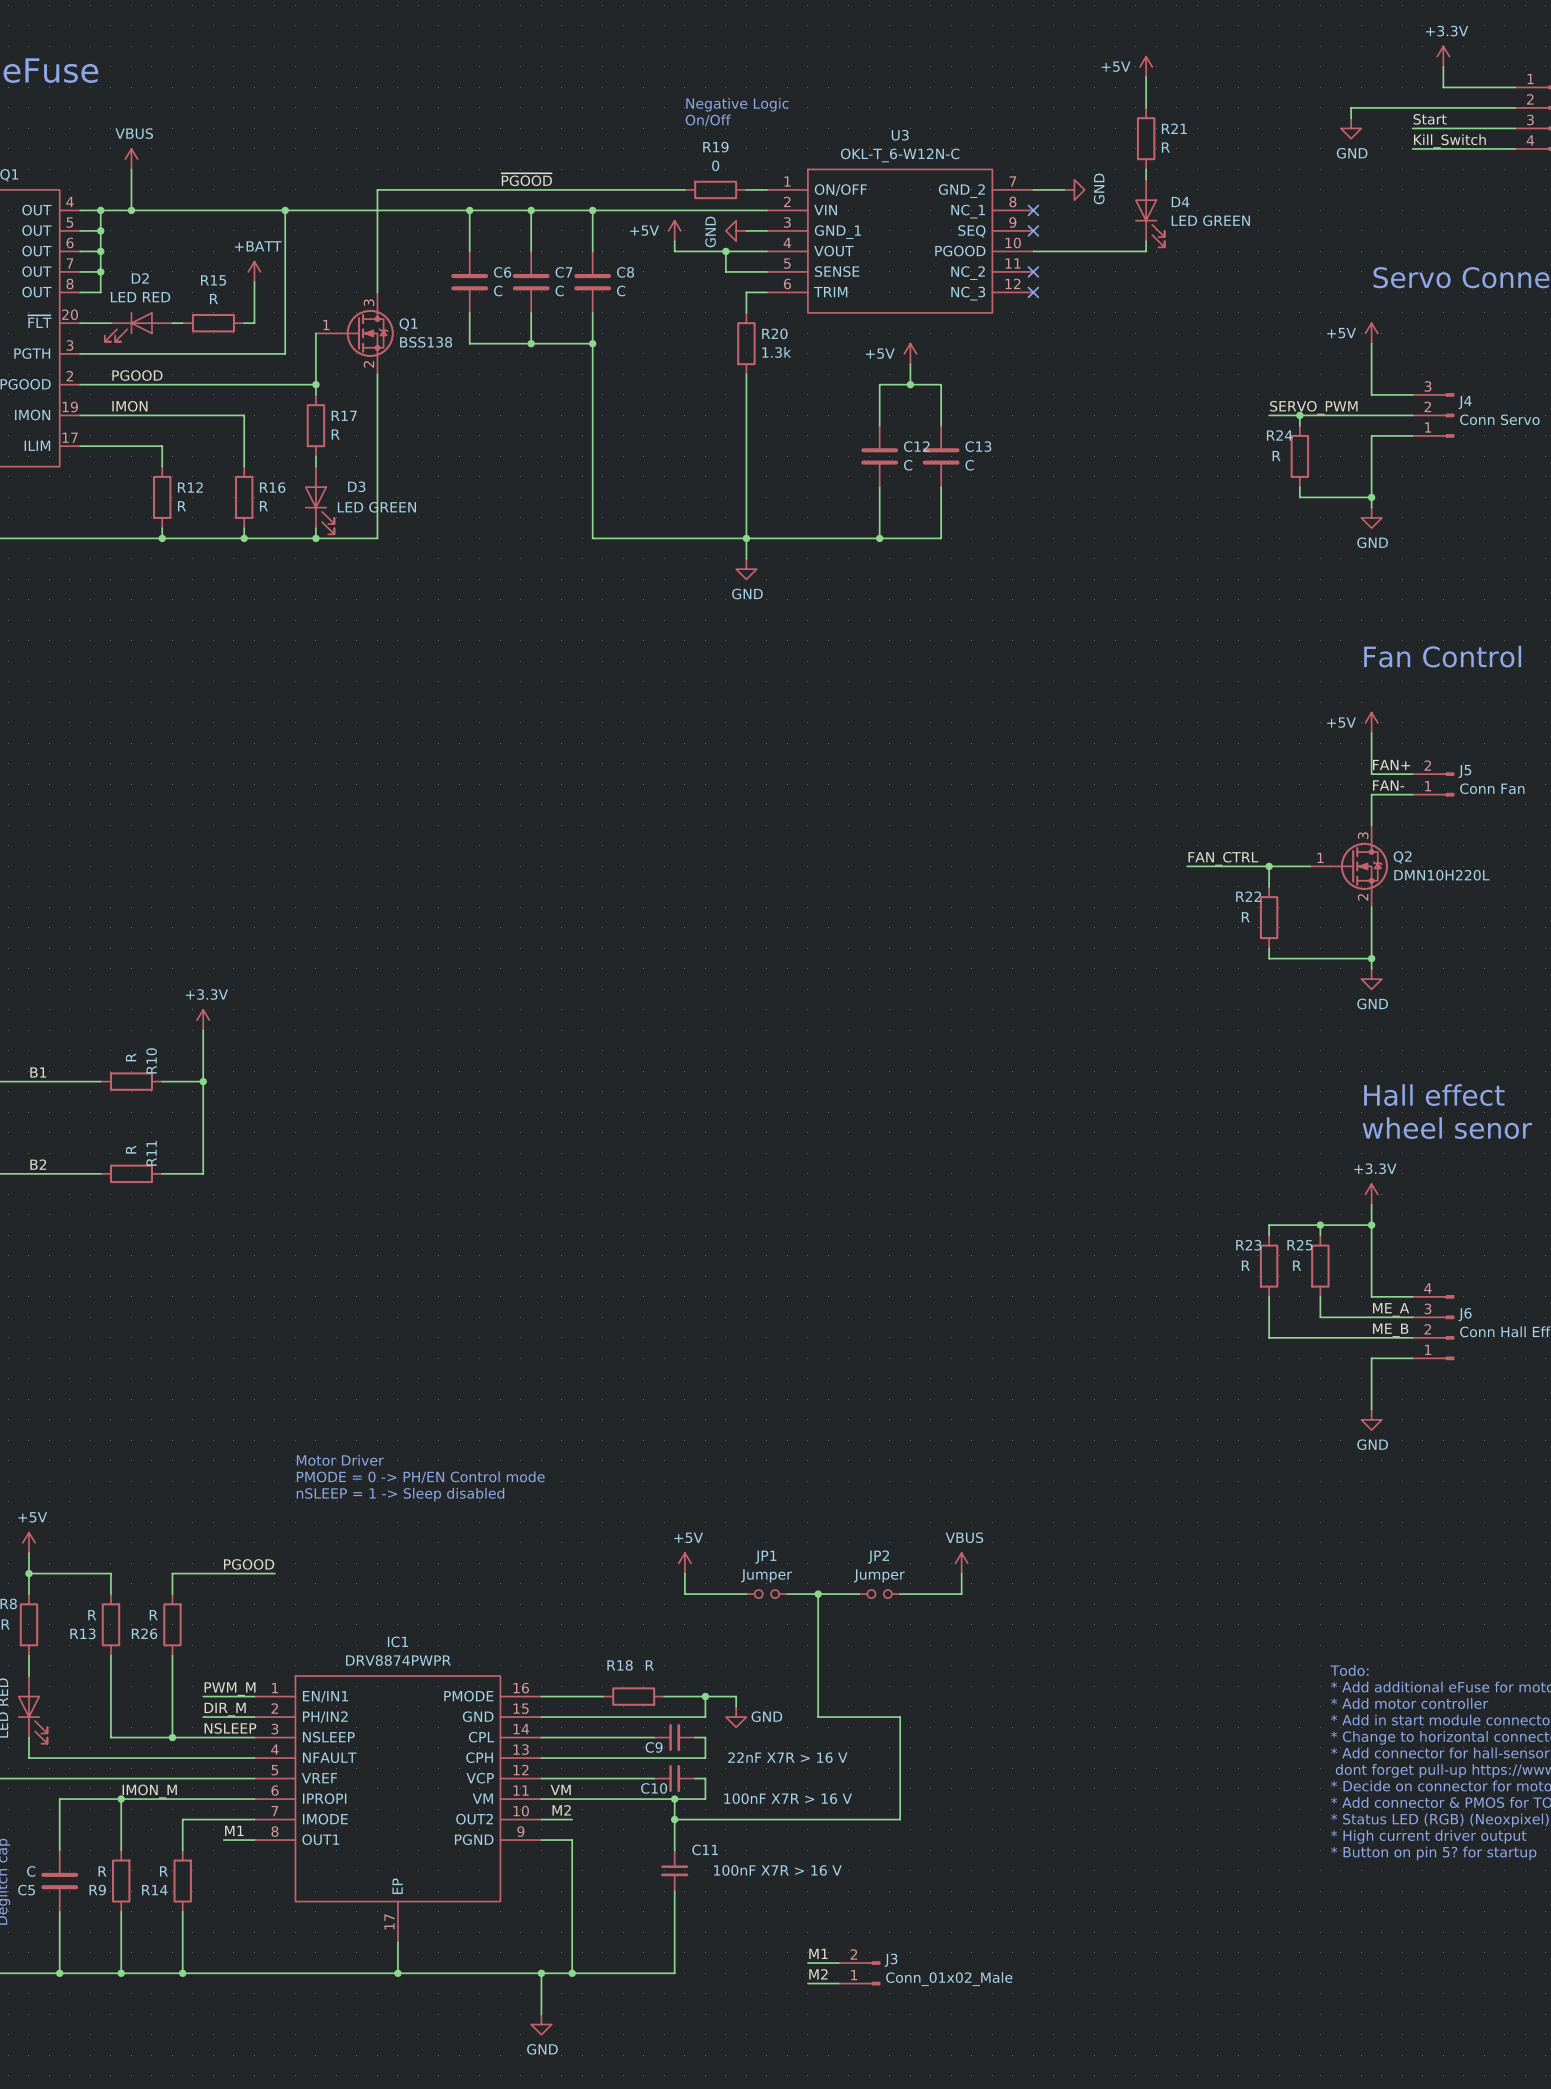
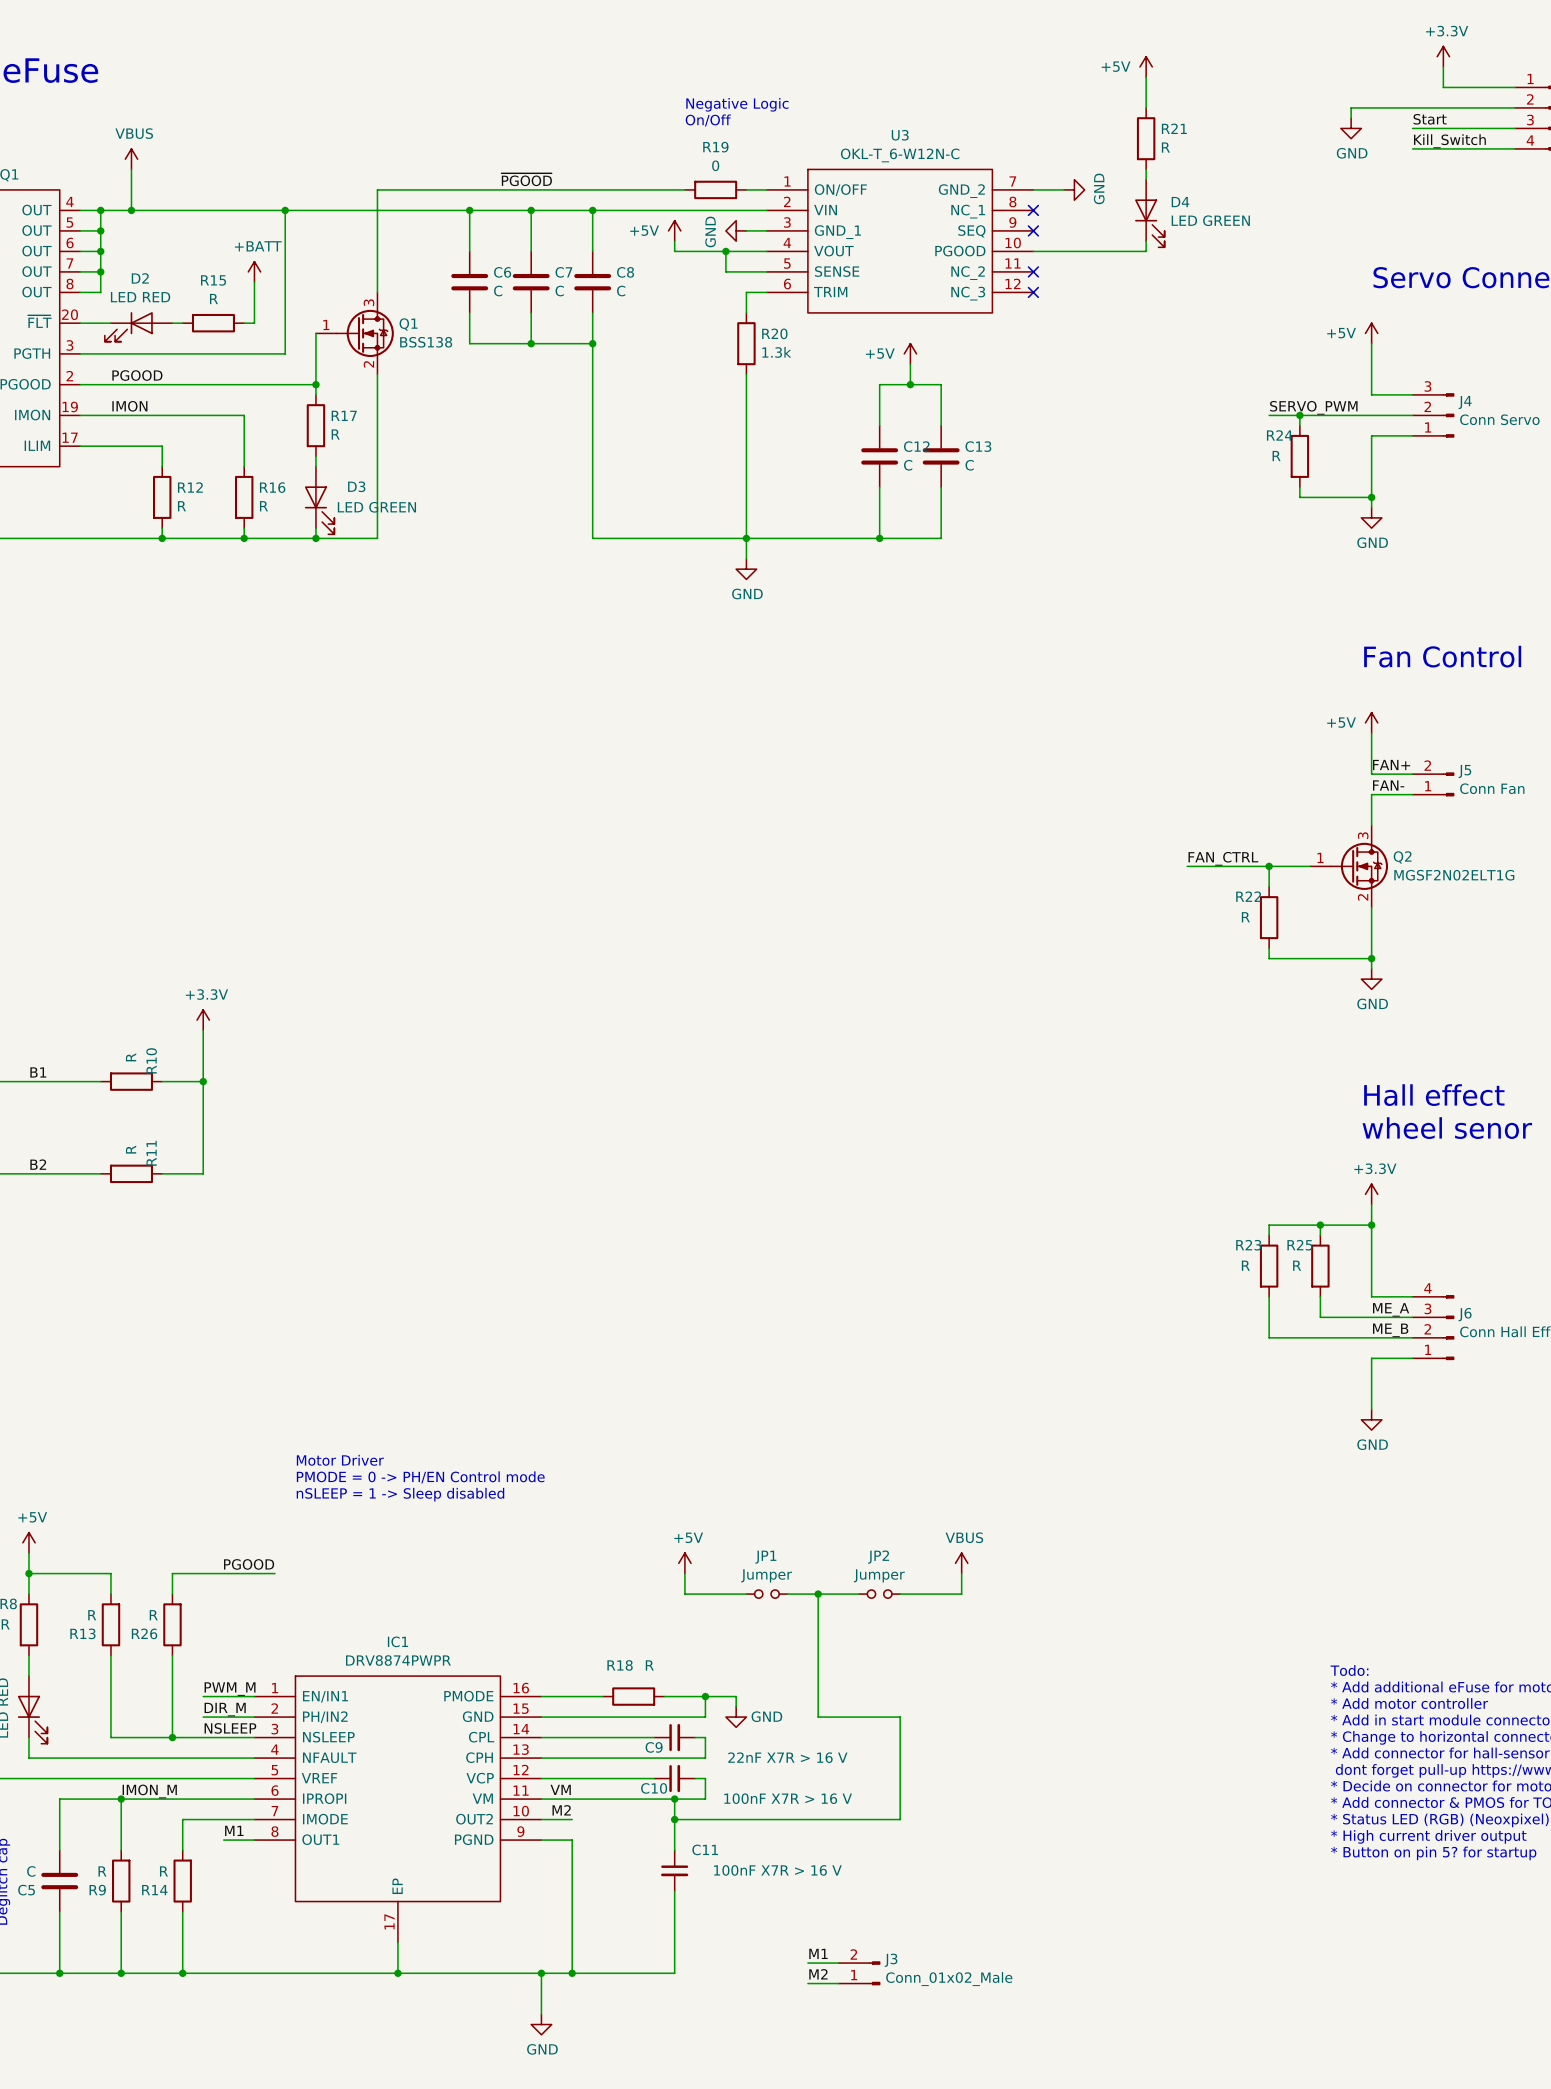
Q2 value: DMN10H220L (1441, 875) -> MGSF2N02ELT1G (1454, 875)

